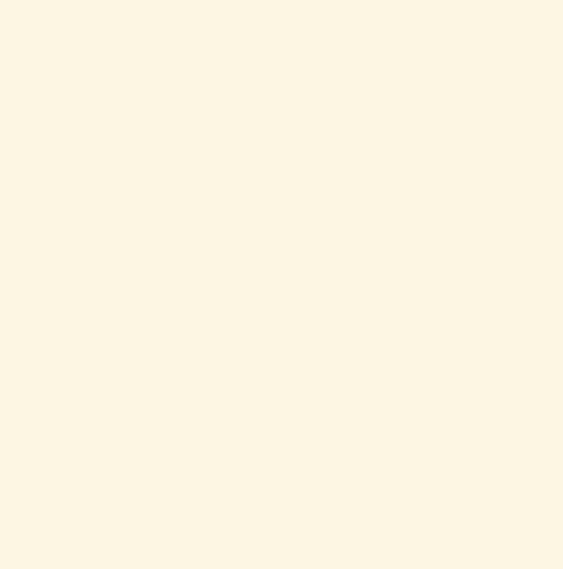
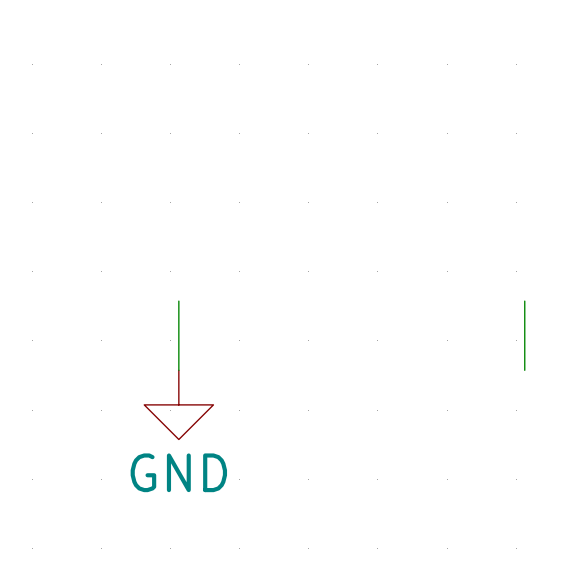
wire: none -> (178, 301) (178, 370)
wire: none -> (524, 301) (524, 370)
power symbol: none -> GND (178, 404)

